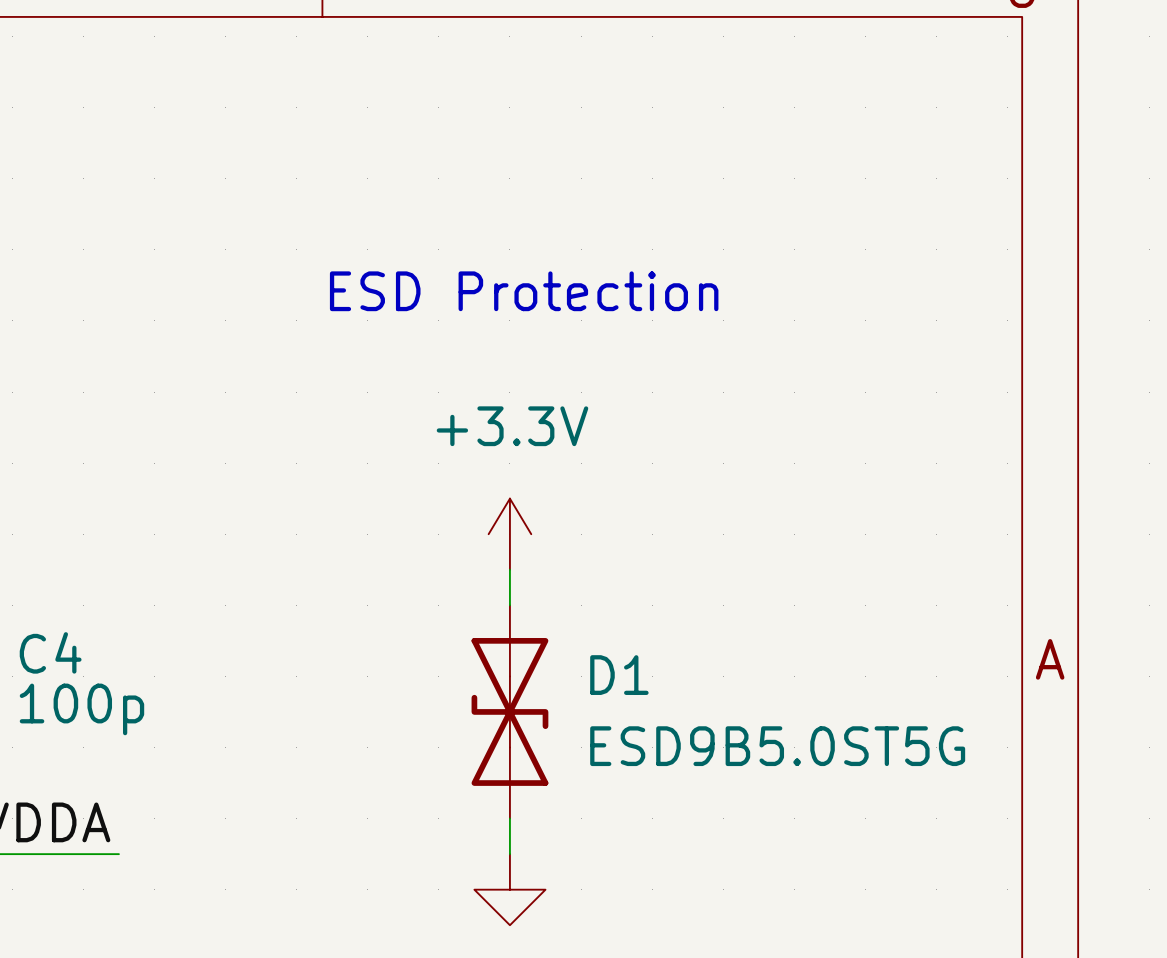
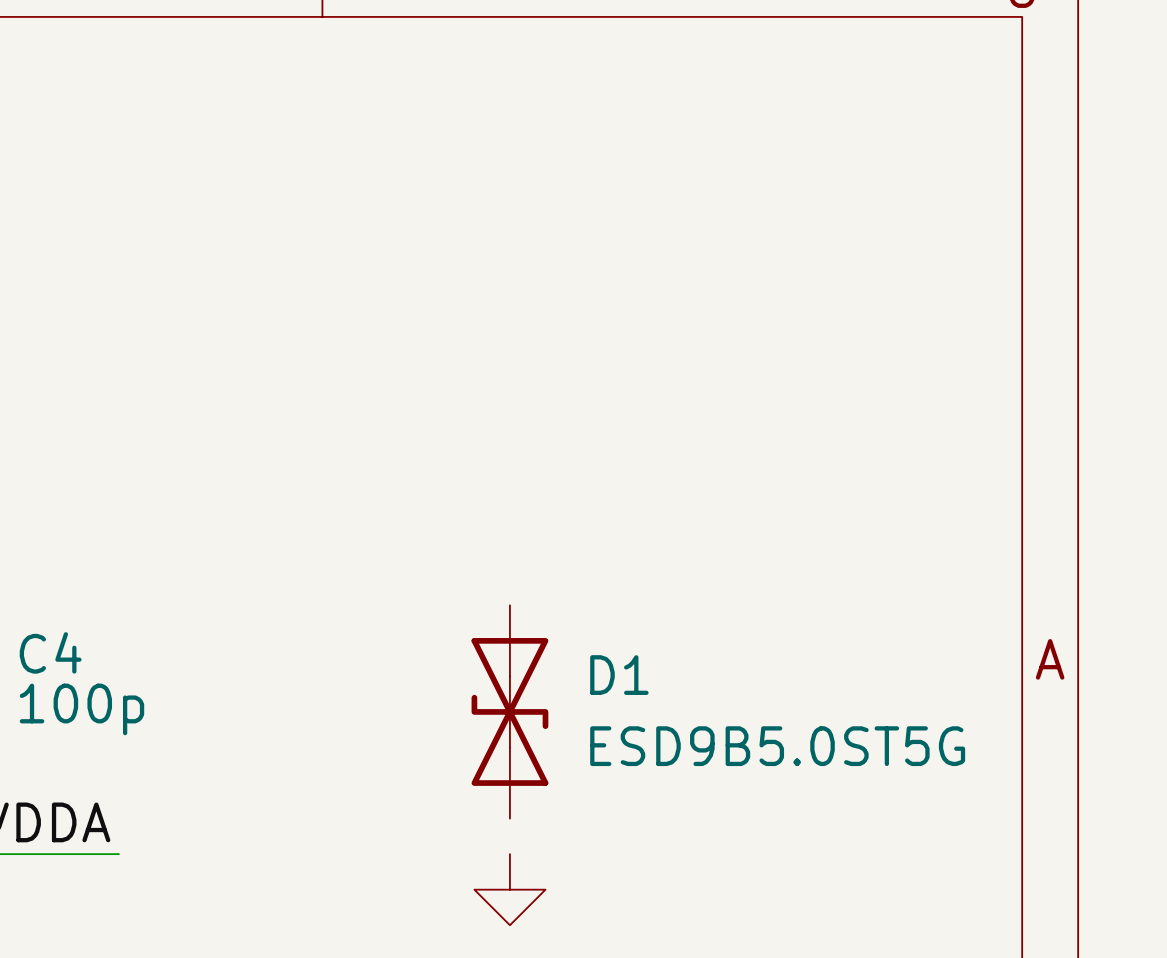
text: ESD Protection (524, 291) -> none
power symbol: +3.3V (509, 534) -> none
wire: (509, 569) (509, 605) -> none
wire: (509, 818) (509, 854) -> none

